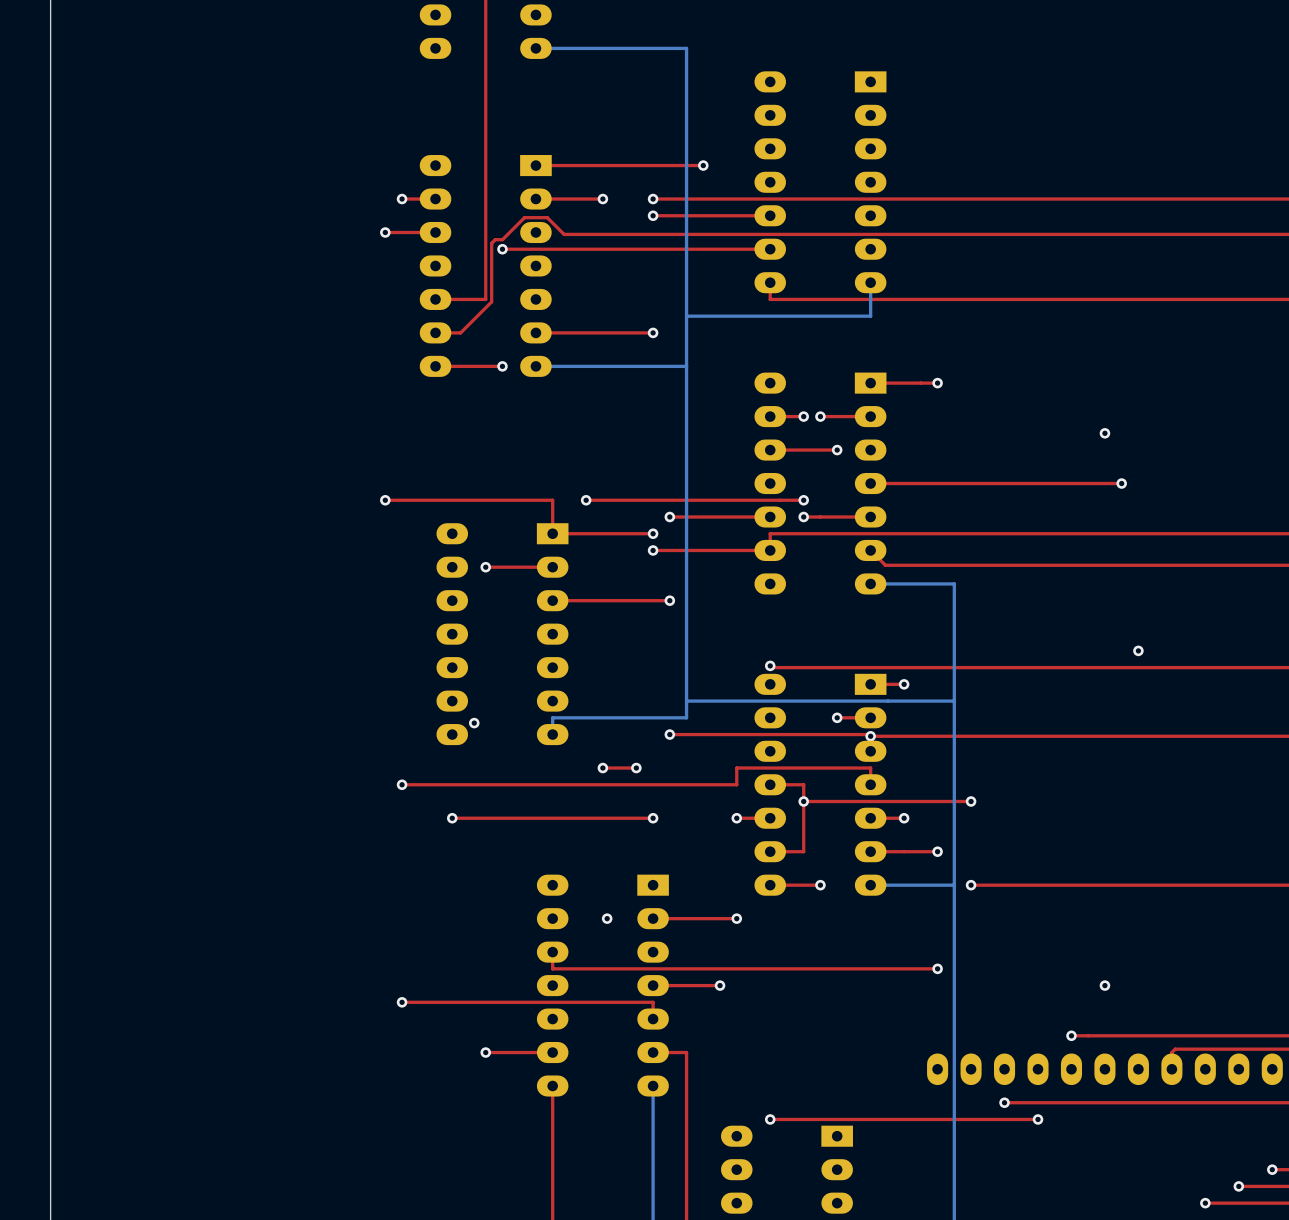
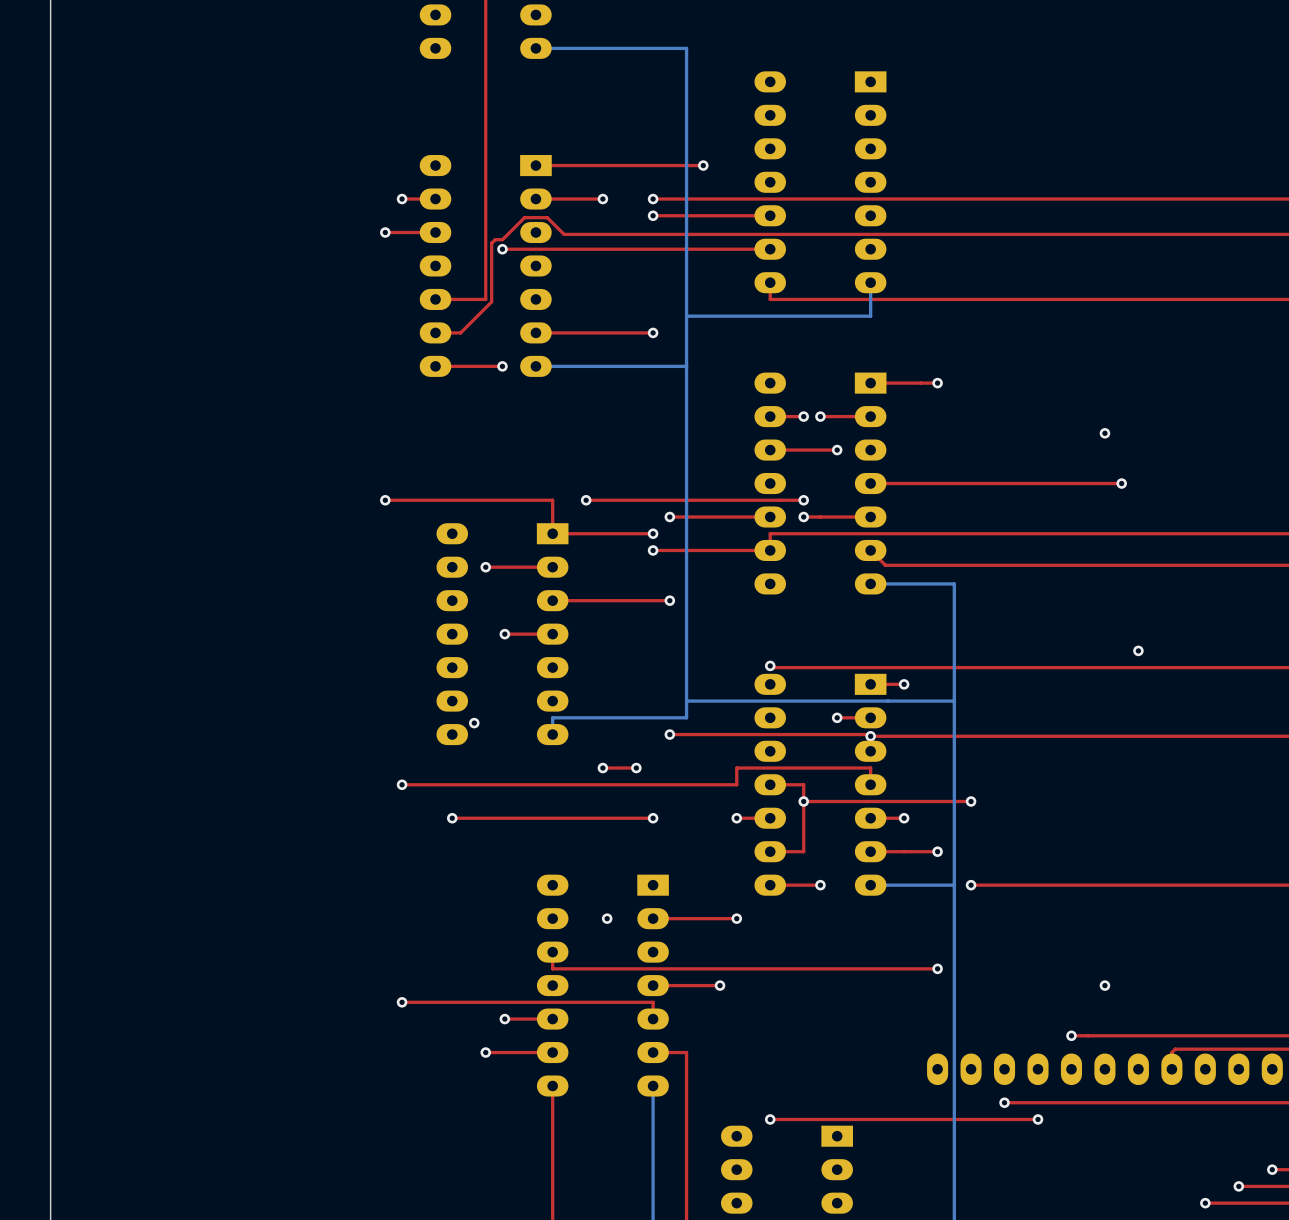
via: none -> (504, 634)
top track: none -> (552, 634) (504, 634)
via: none -> (504, 1019)
top track: none -> (552, 1019) (504, 1019)

